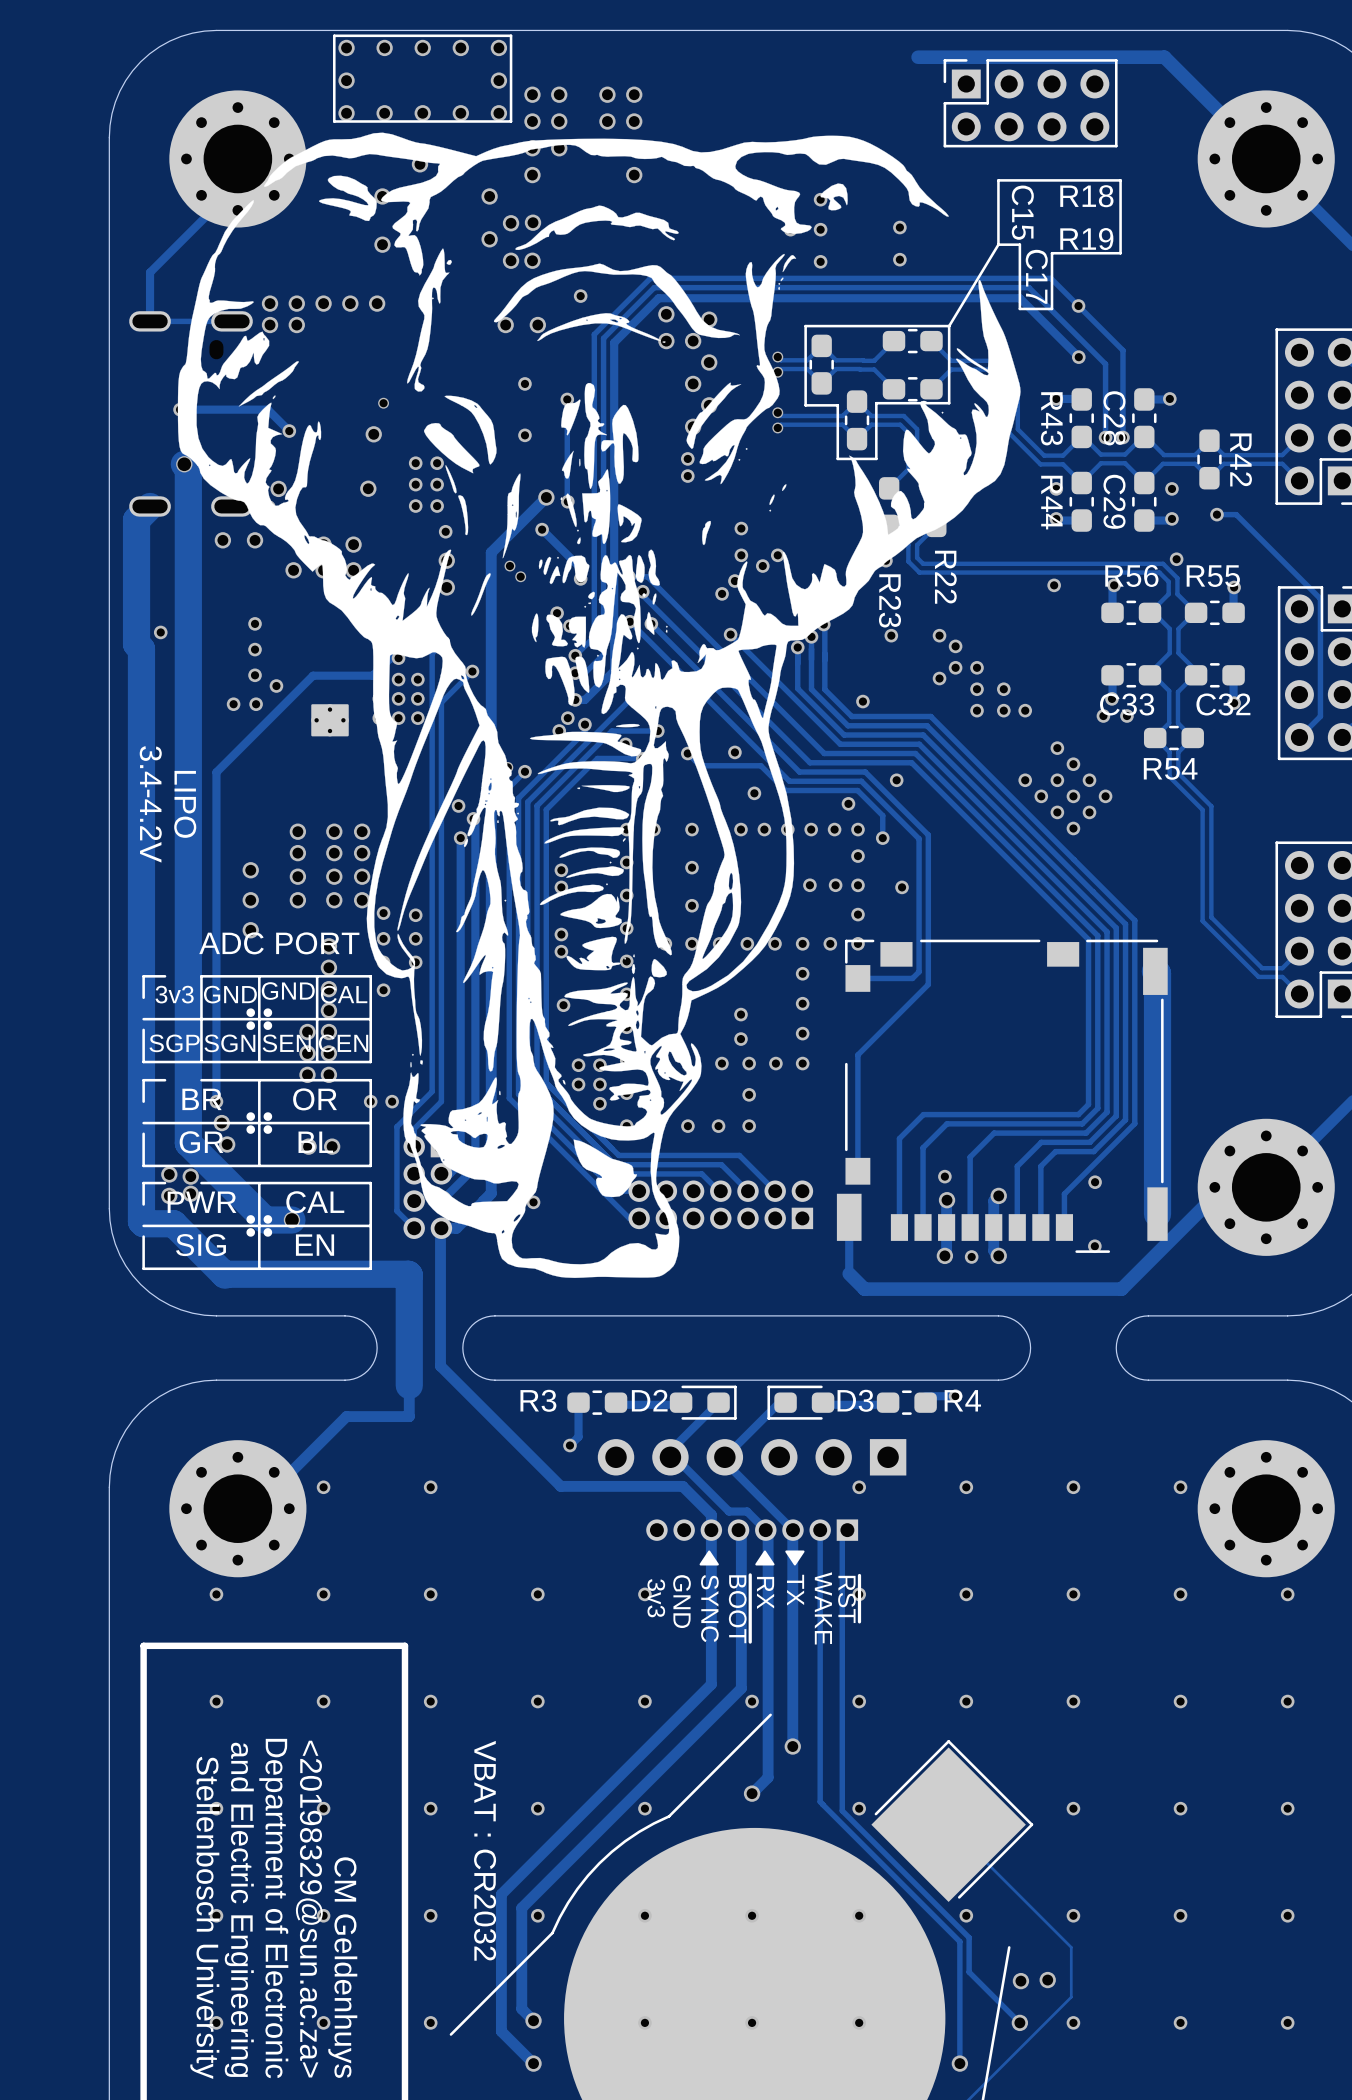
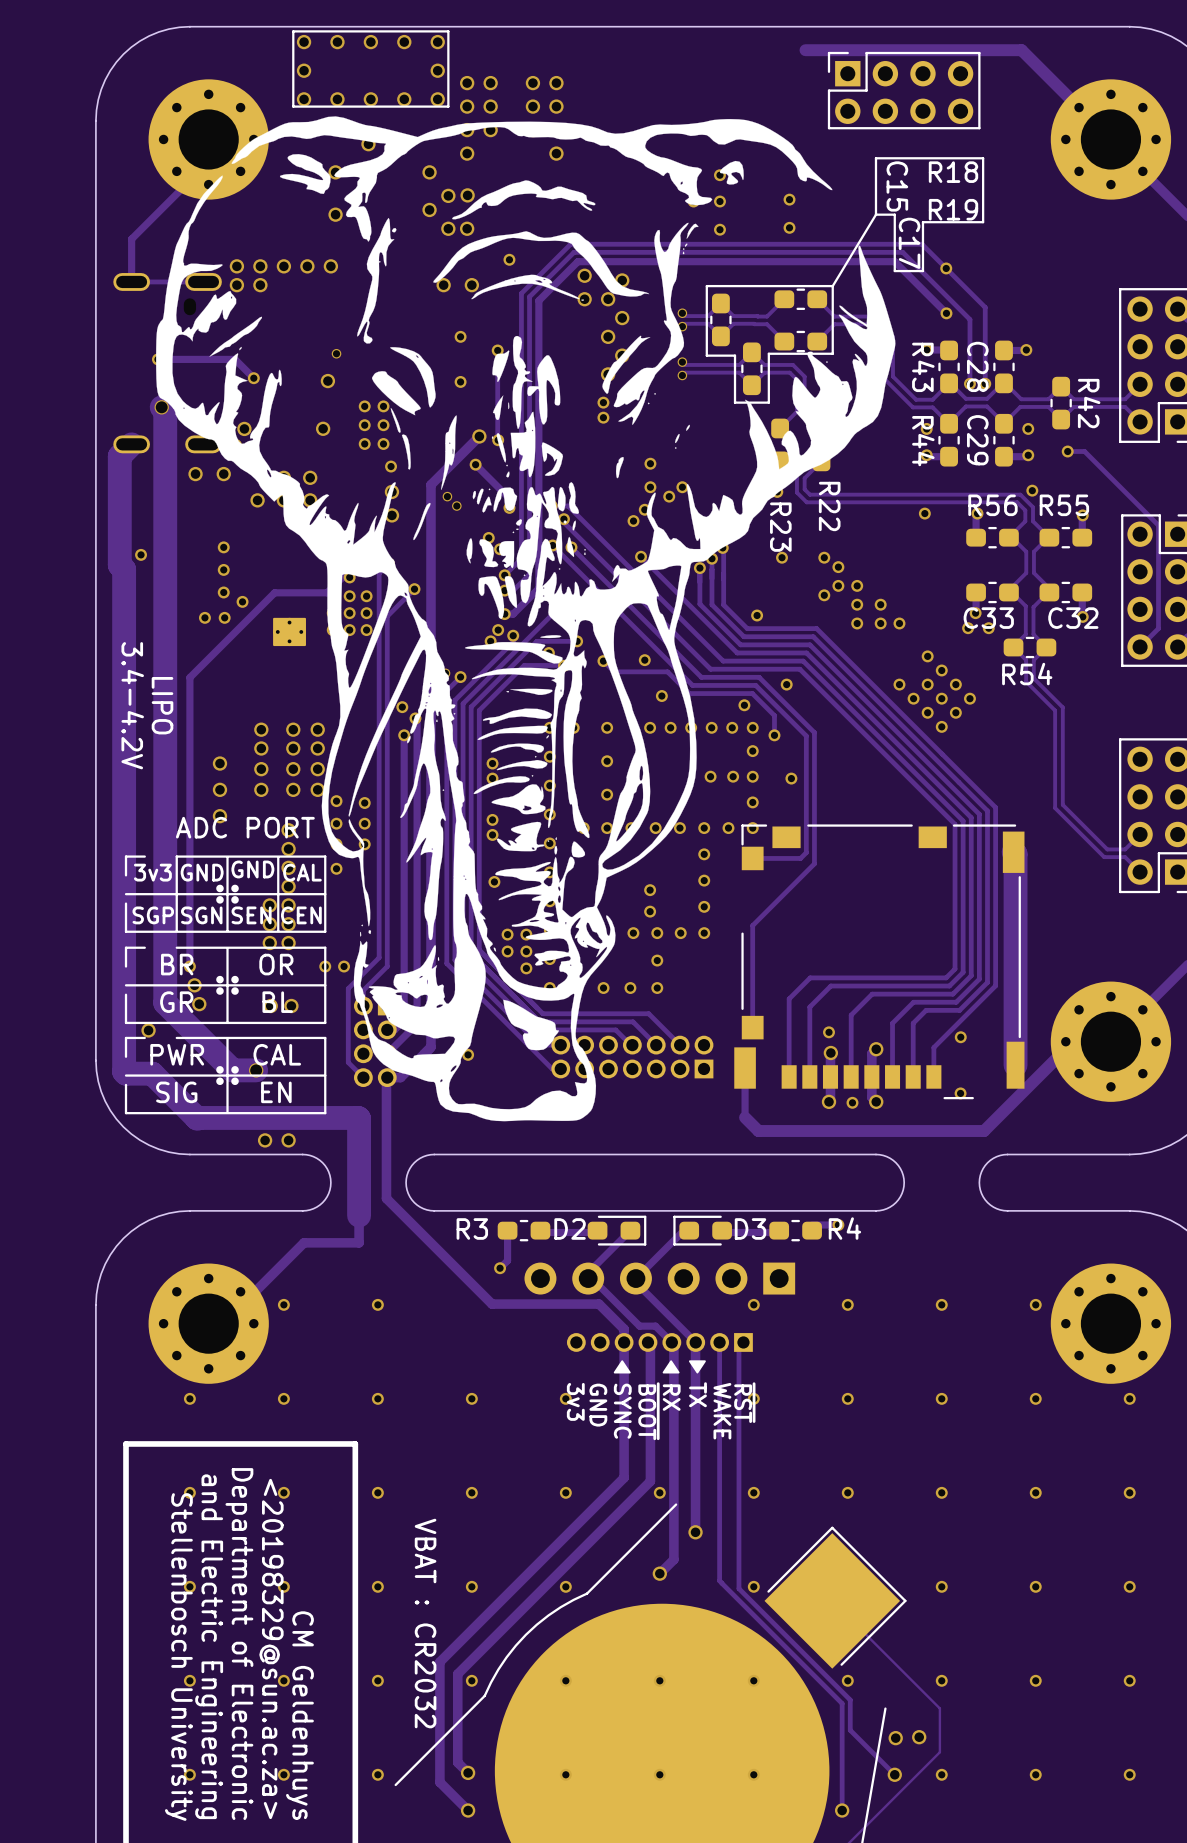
via: (190, 1176) -> none
via: (190, 1193) -> none
via: (169, 1195) -> none
via: none -> (265, 1140)
via: none -> (288, 1140)

